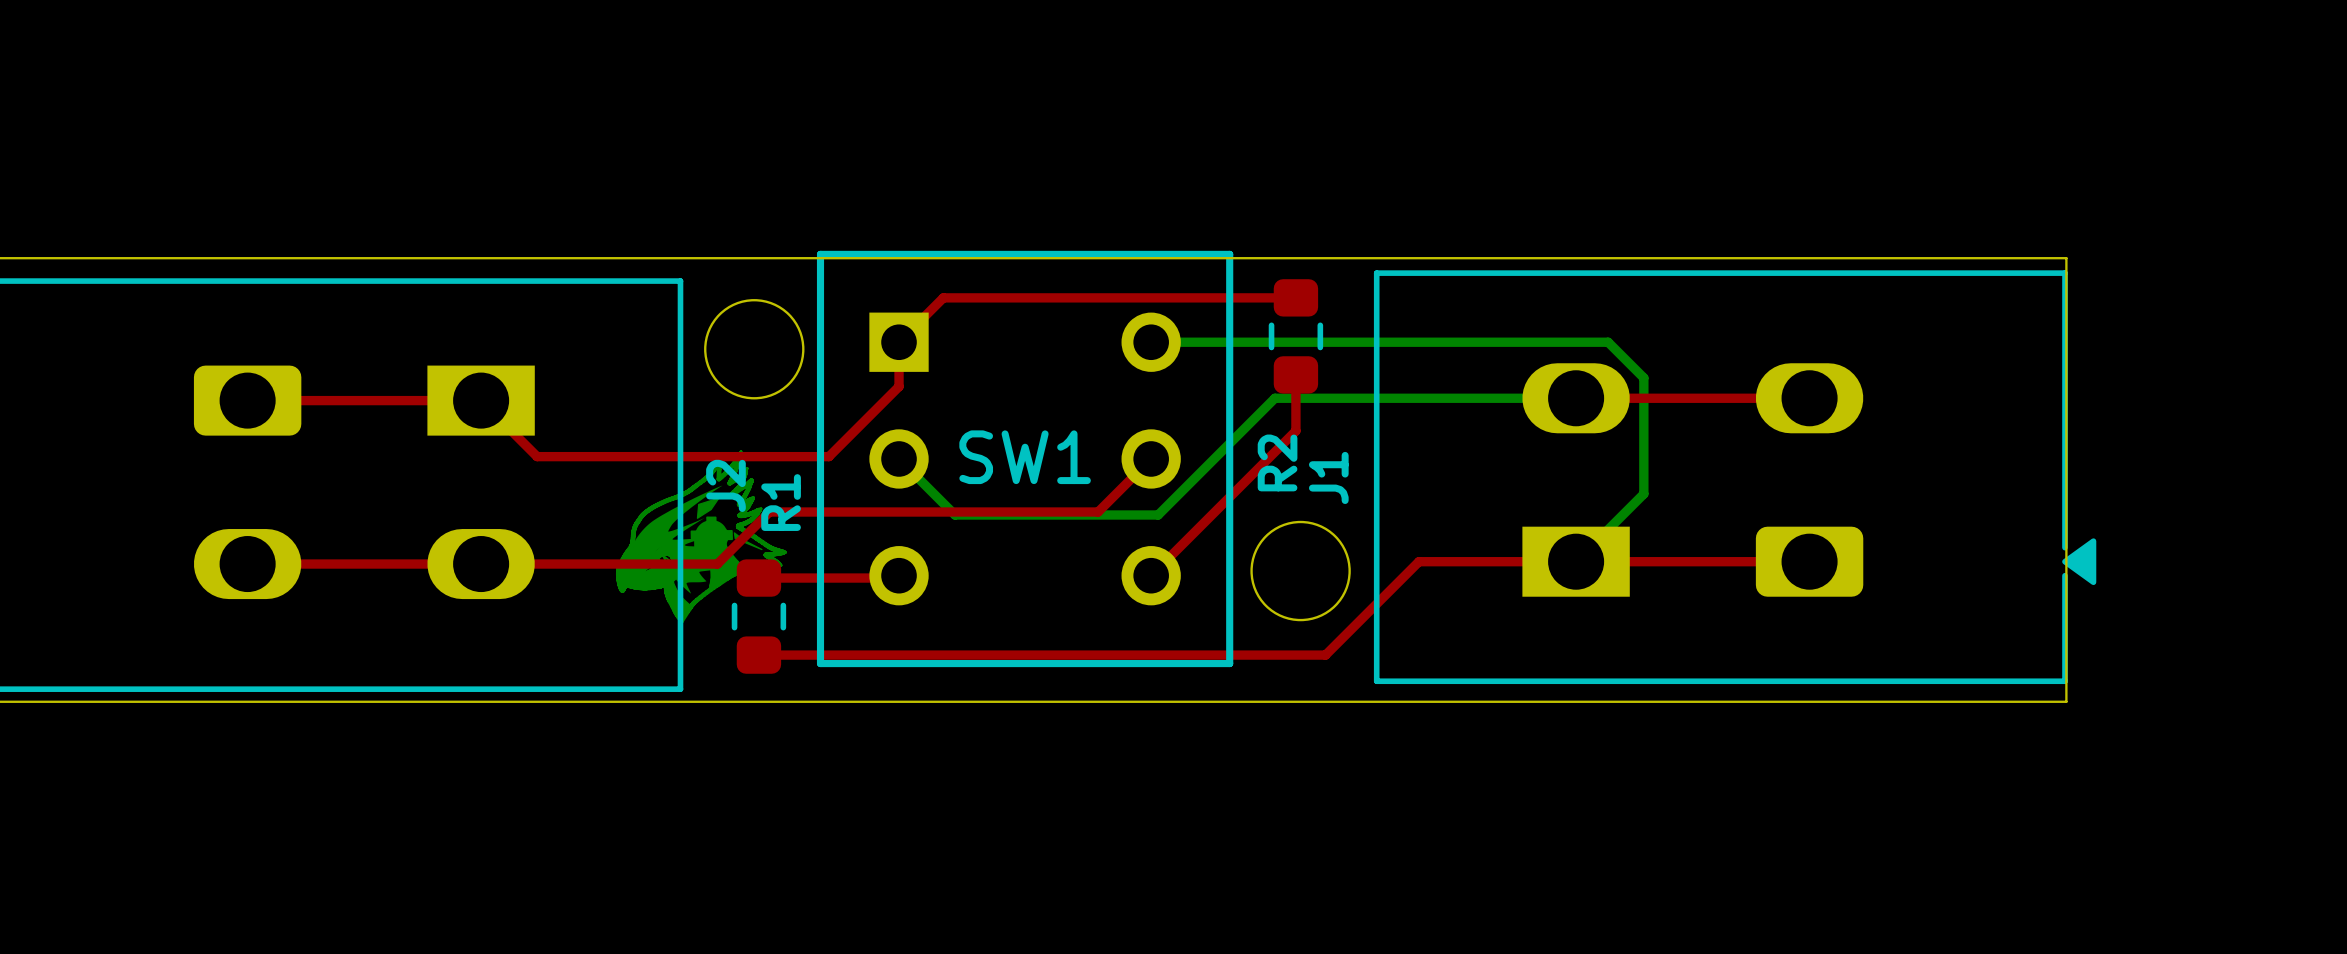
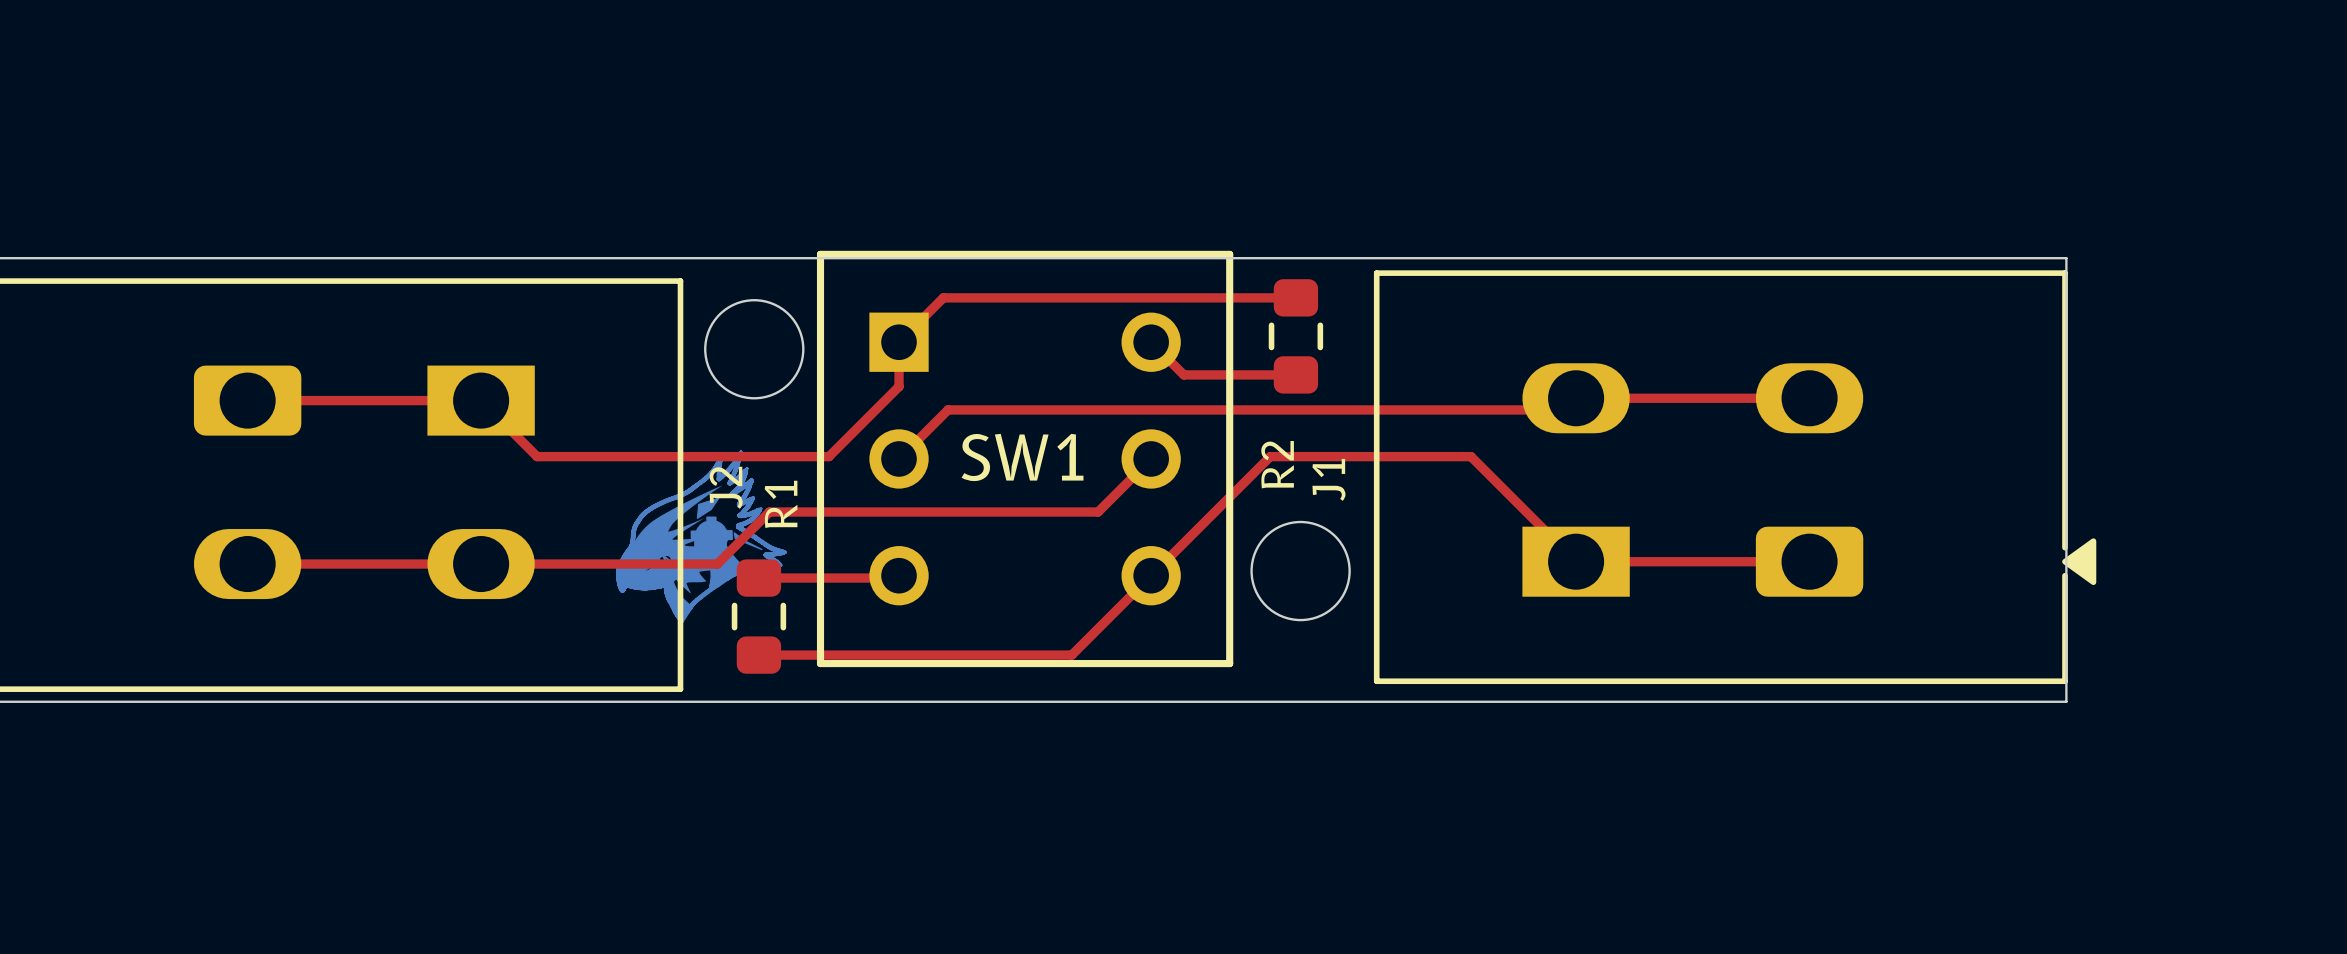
bottom track: (1151, 342) (1608, 342) (1643, 377) (1643, 493) (1576, 561) -> none
top track: (1295, 374) (1295, 430) (1270, 456) -> (1295, 374) (1183, 374) (1151, 342)
bottom track: (1576, 398) (1274, 398) (1158, 515) (955, 515) (899, 458) -> none
top track: none -> (1564, 409) (948, 409) (899, 458)
top track: (1576, 561) (1418, 561) (1325, 655) (1071, 655) -> (1576, 561) (1471, 456) (1270, 456)
top track: none -> (1151, 575) (1071, 655)

